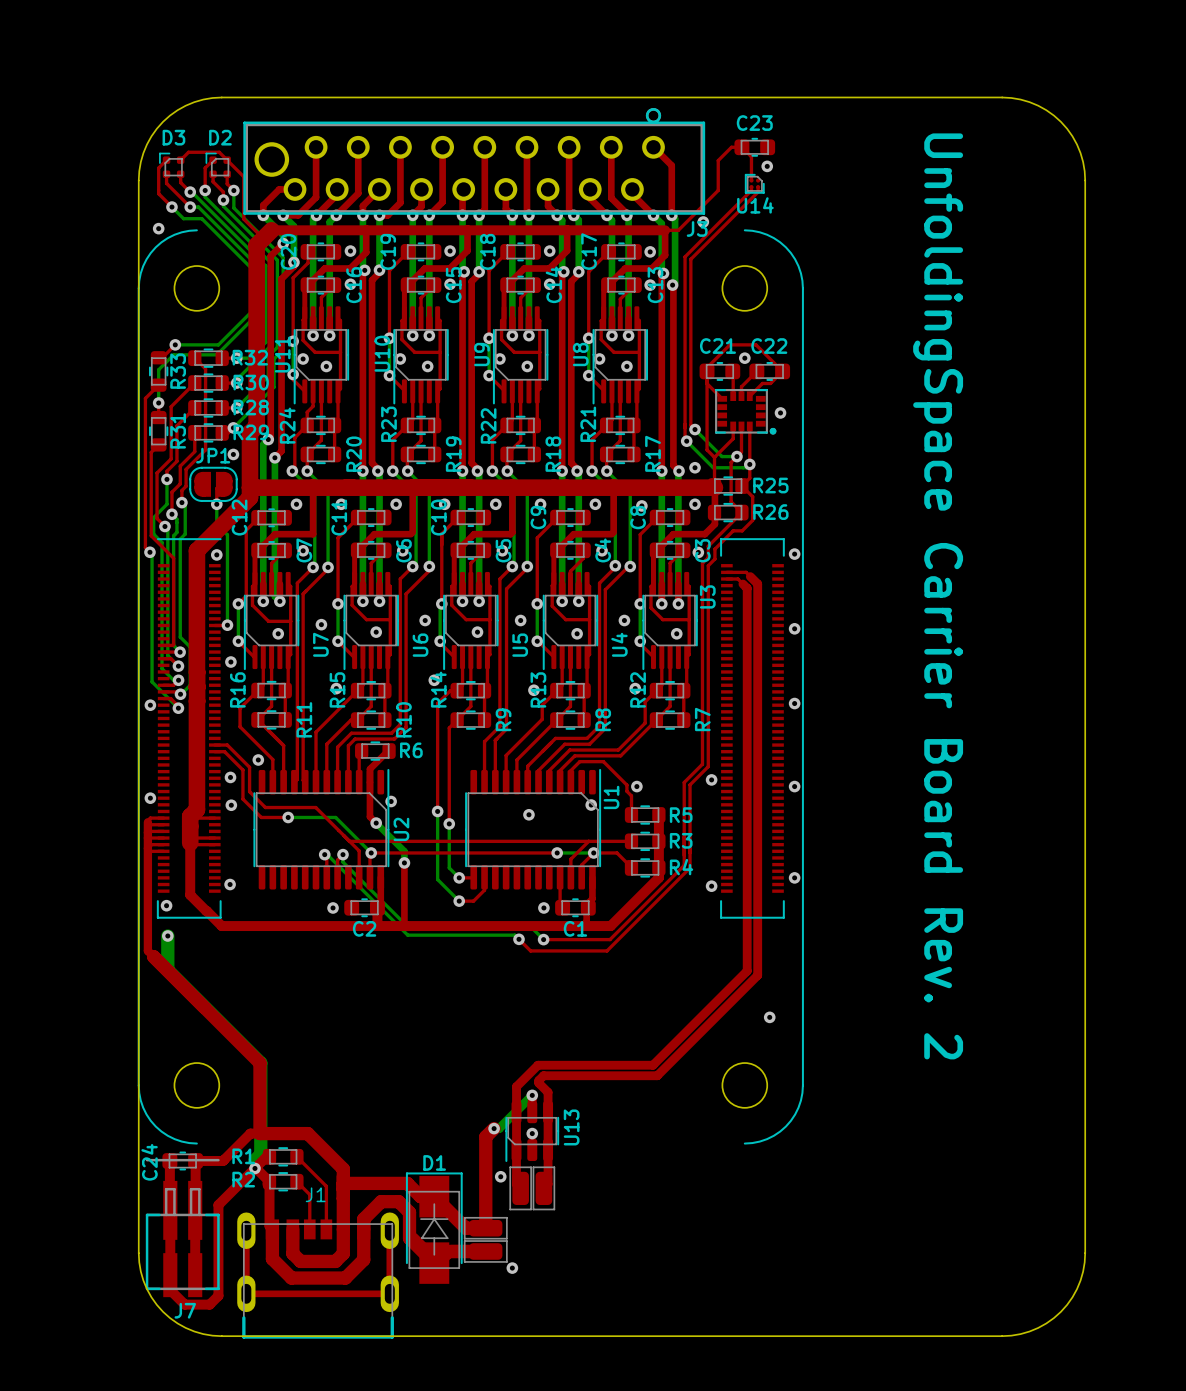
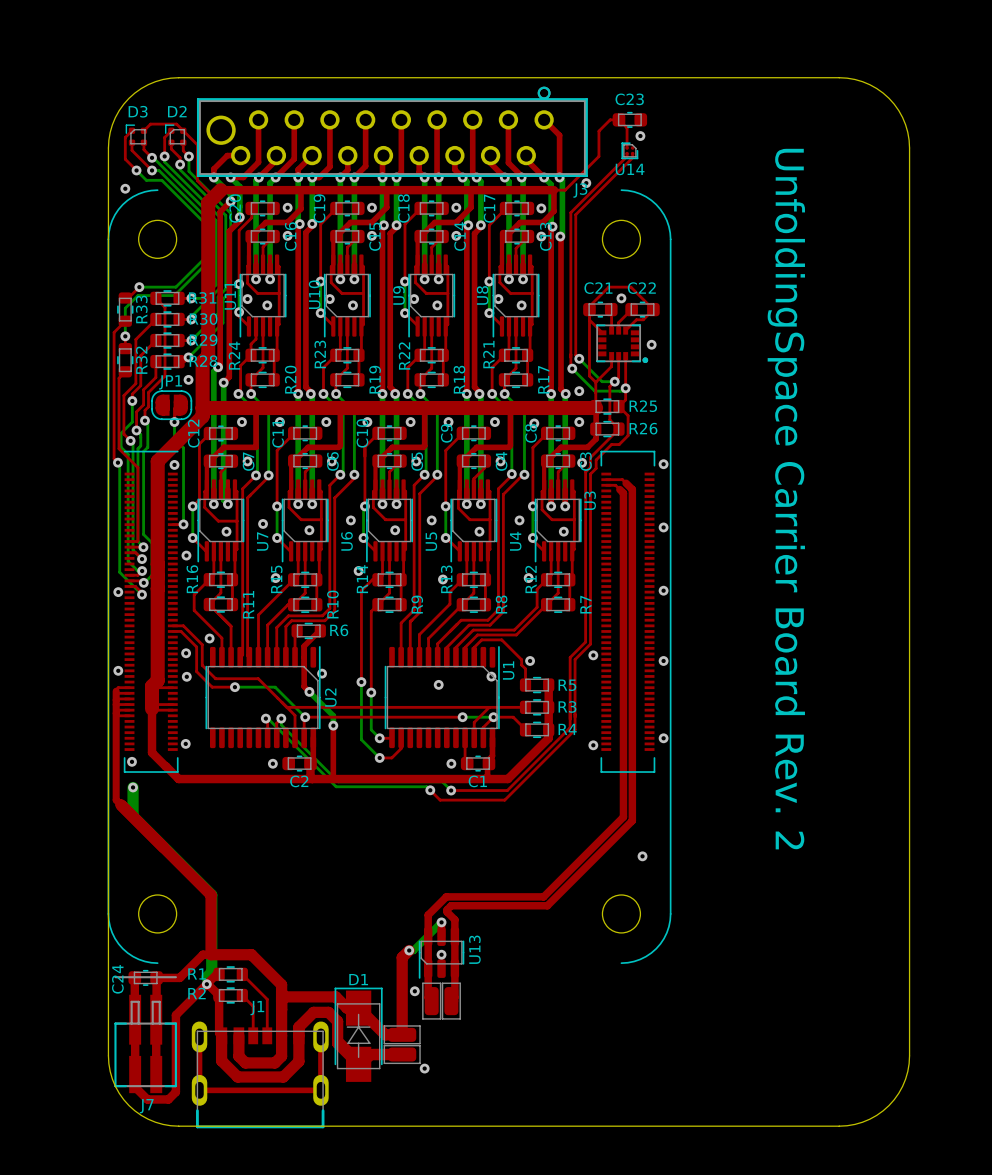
R32 name: R32 (250, 357) -> R31 (202, 297)
R28 name: R28 (251, 407) -> R29 (203, 340)
R31 name: R31 (178, 430) -> R32 (141, 360)
R29 name: R29 (251, 432) -> R28 (203, 361)

